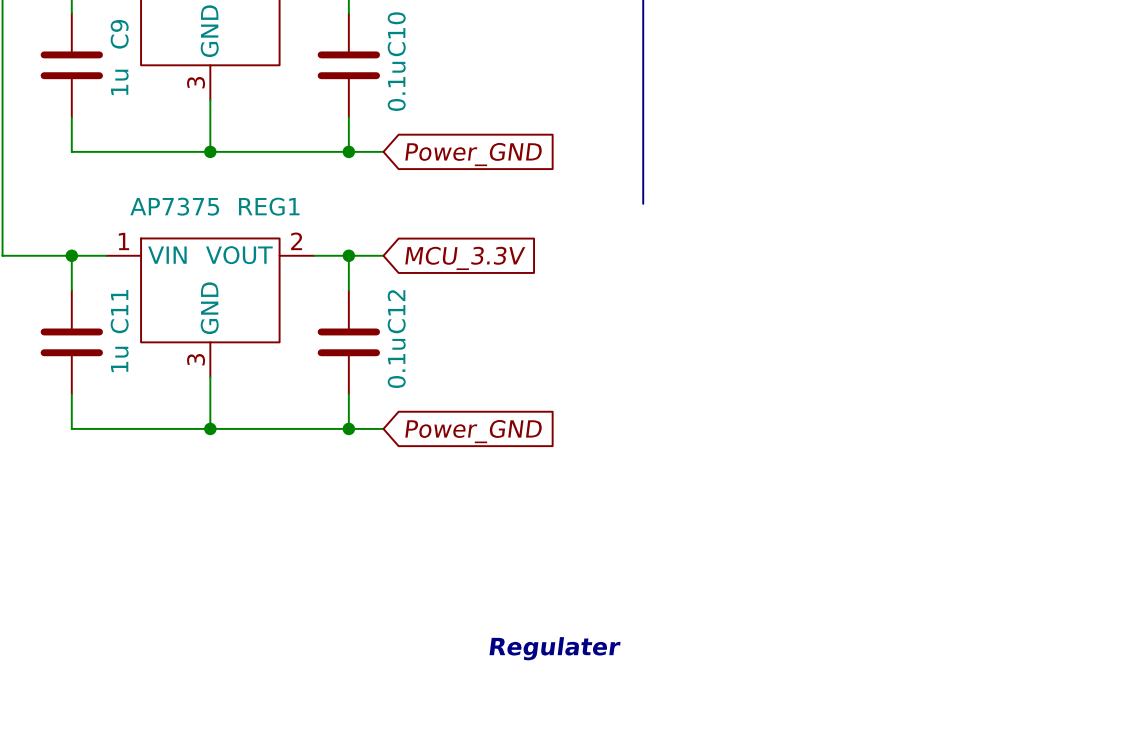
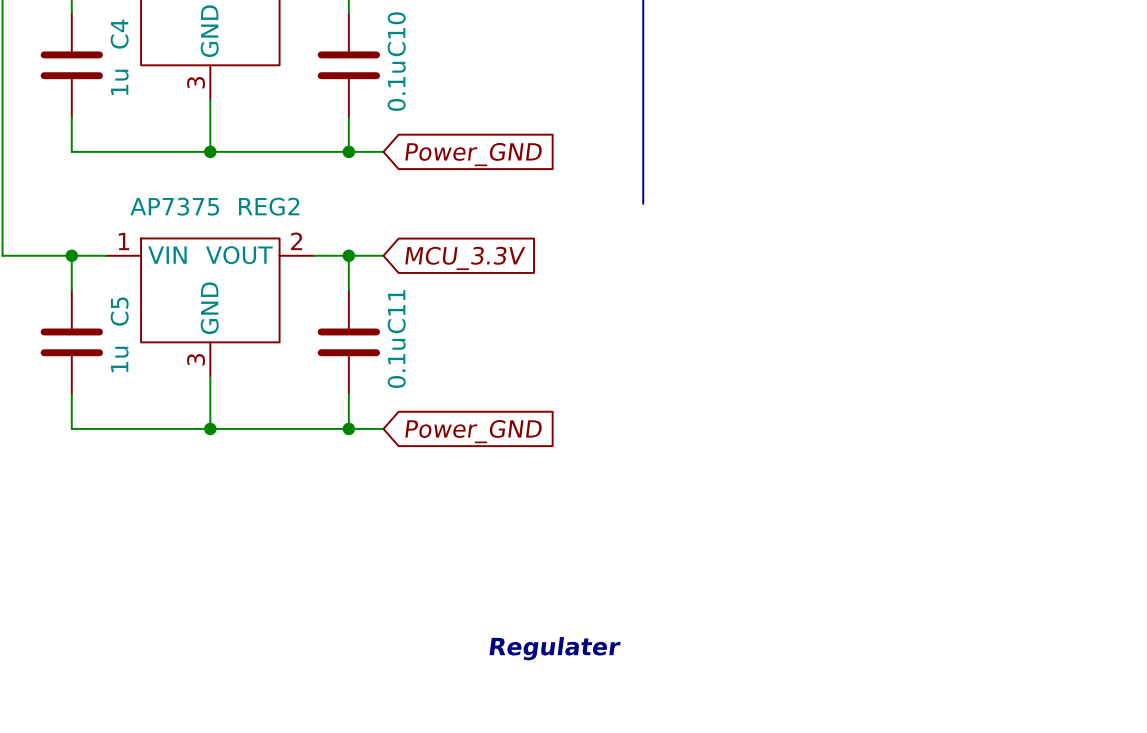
C9 name: C9 (119, 34) -> C4 (119, 34)
REG1 name: REG1 (269, 206) -> REG2 (269, 206)
C11 name: C11 (119, 311) -> C5 (119, 311)
C12 name: C12 (396, 311) -> C11 (396, 311)

